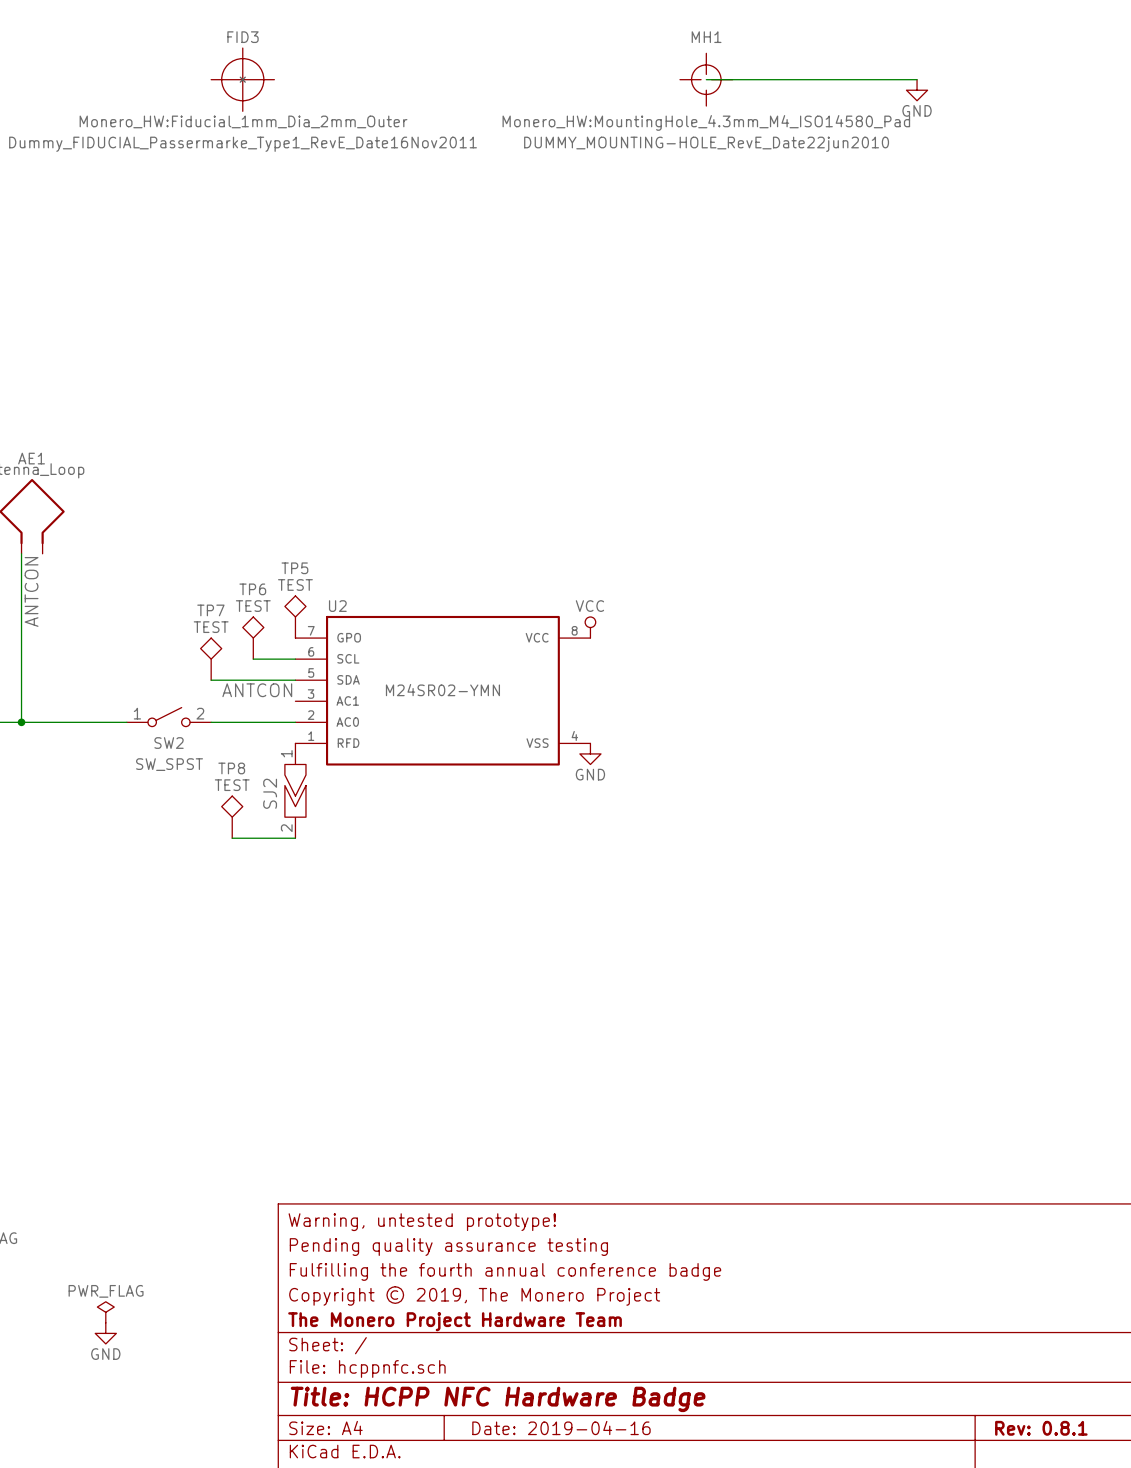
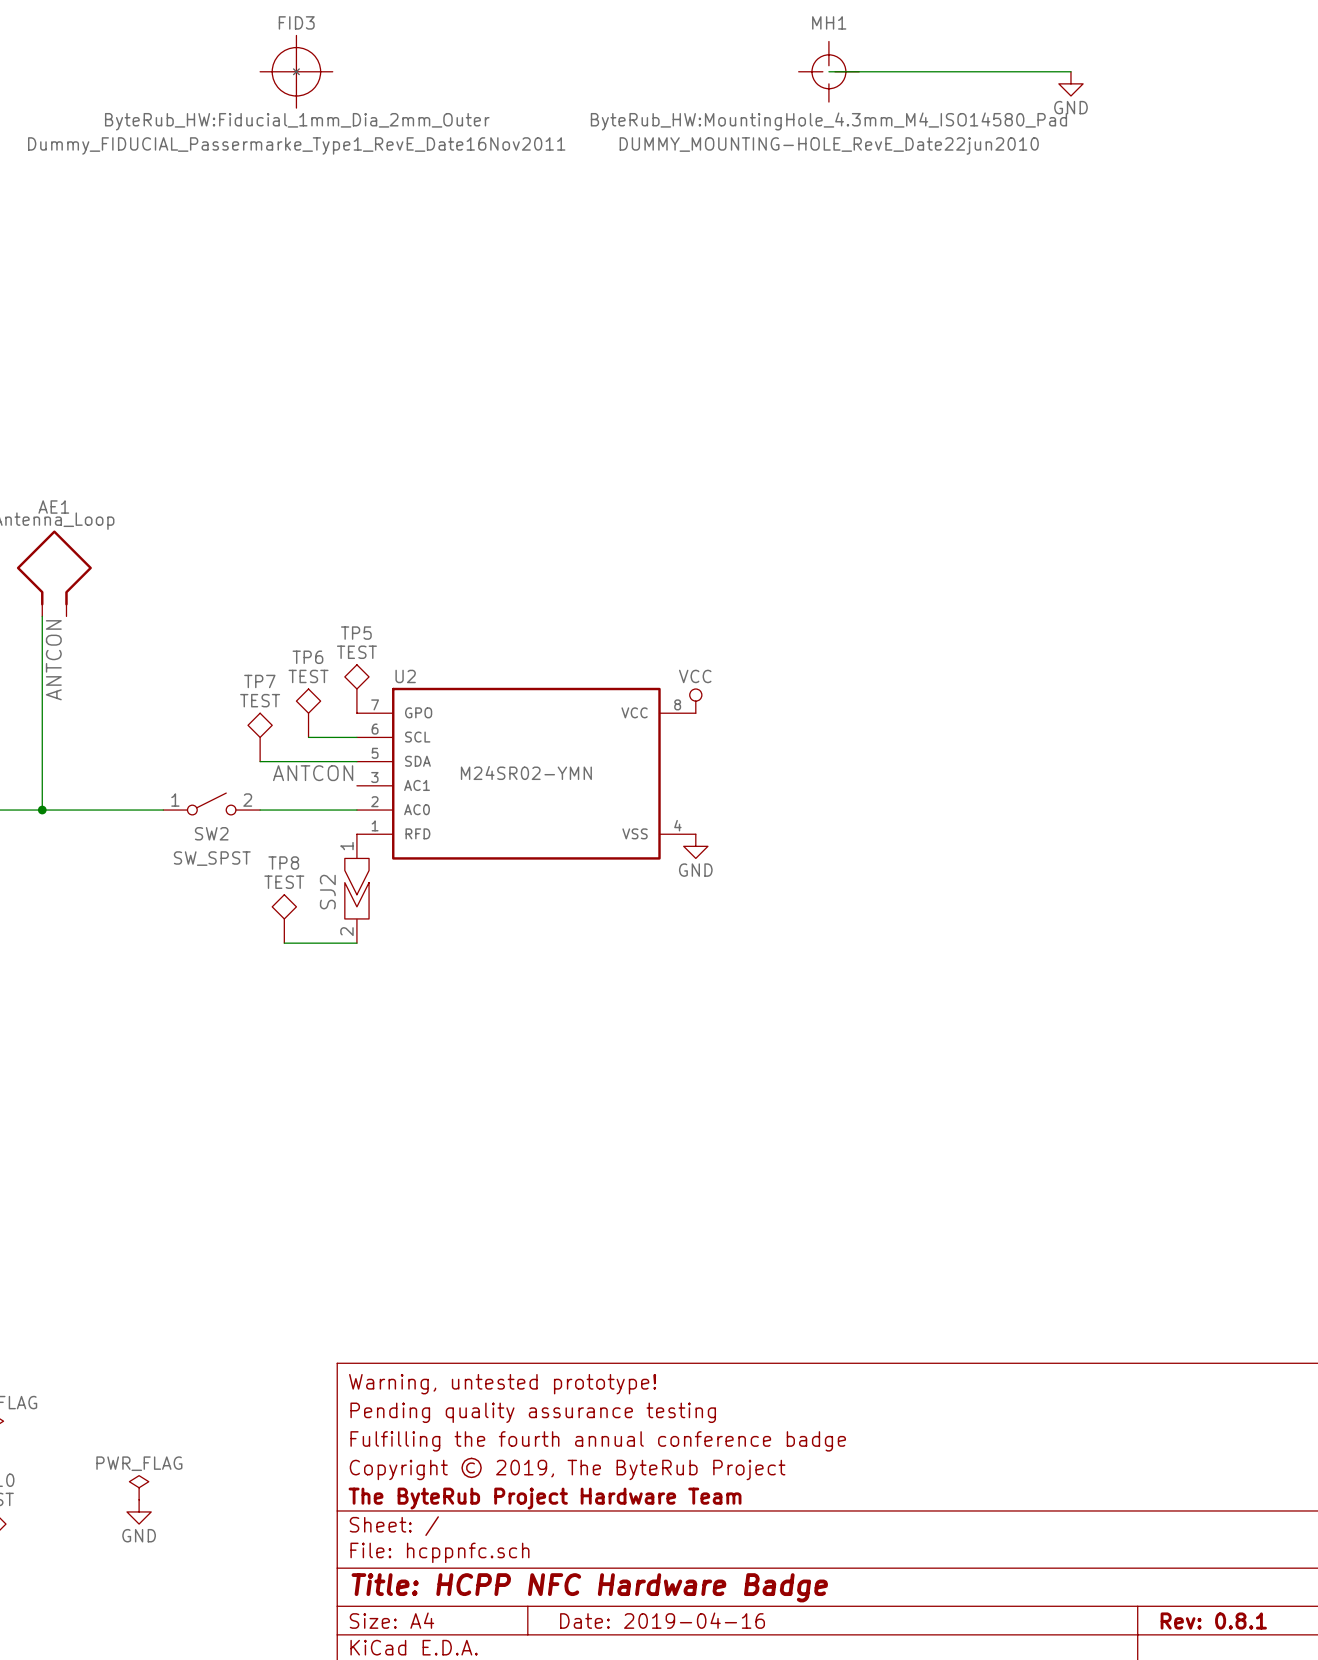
FID3 text: Monero_HW:Fiducial_1mm_Dia_2mm_Outer (243, 121) -> ByteRub_HW:Fiducial_1mm_Dia_2mm_Outer (297, 121)
MH1 text: Monero_HW:MountingHole_4.3mm_M4_ISO14580_Pad (706, 122) -> ByteRub_HW:MountingHole_4.3mm_M4_ISO14580_Pad (828, 121)
title block: Copyright © 2019, The Monero Project (474, 1295) -> Copyright © 2019, The ByteRub Project (567, 1468)
title block: The Monero Project Hardware Team (455, 1321) -> The ByteRub Project Hardware Team (545, 1498)

